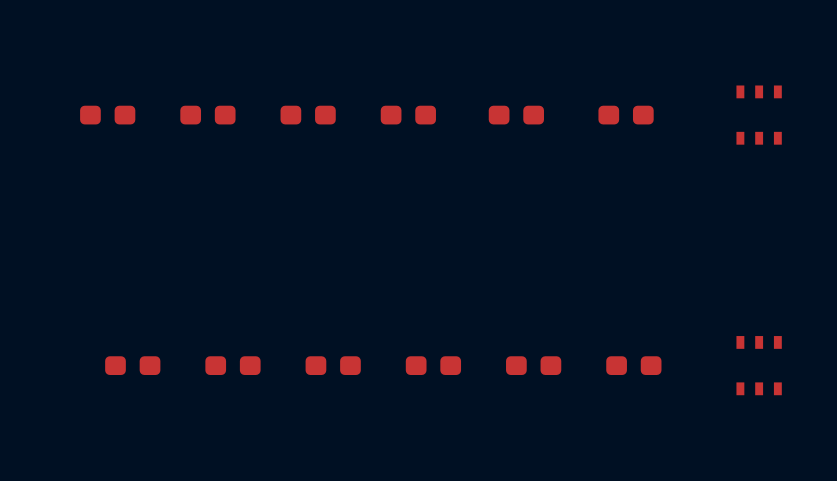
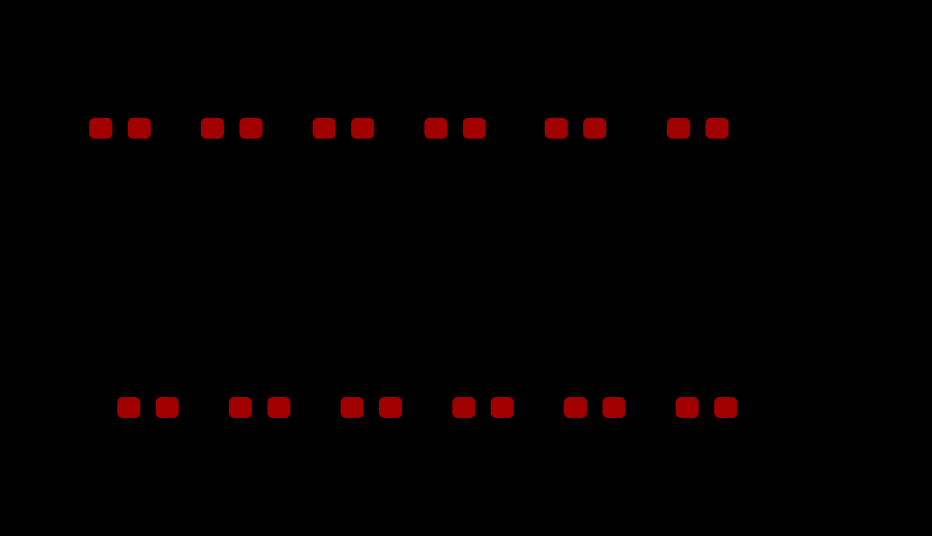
part: (759, 115) -> none
part: (759, 365) -> none

